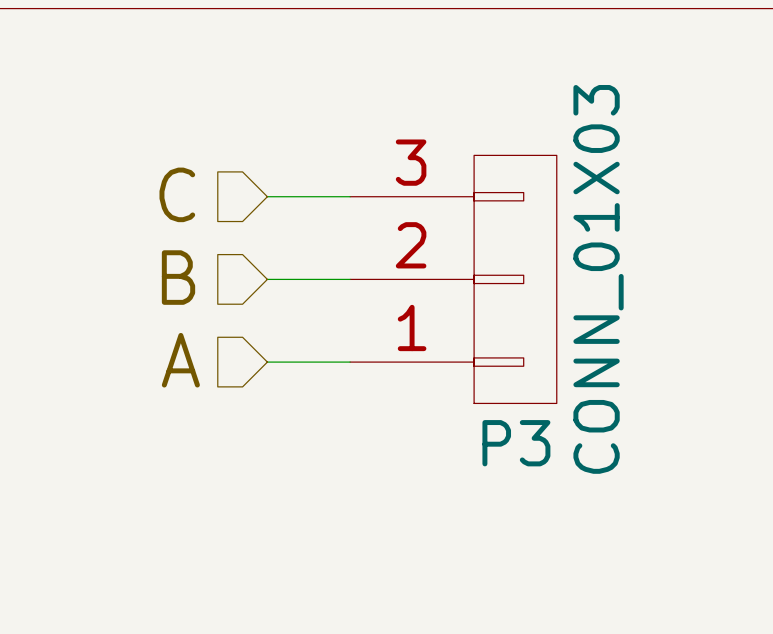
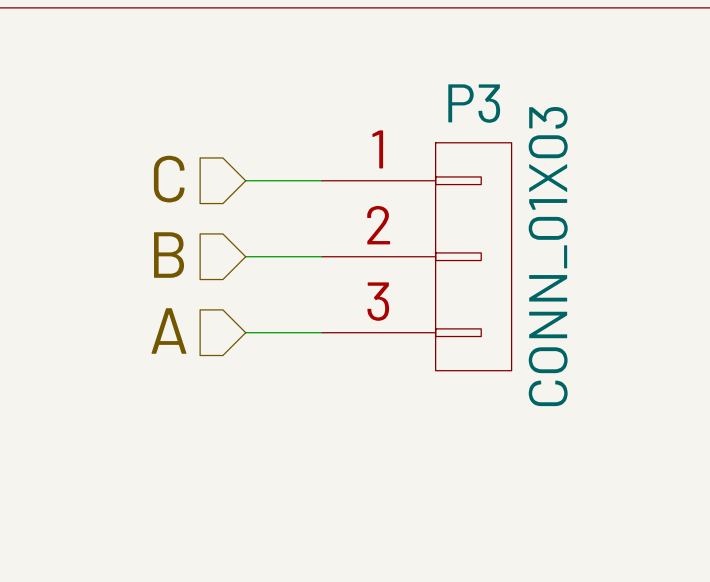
P3 flip: as is (515, 279) -> up-down (473, 256)

